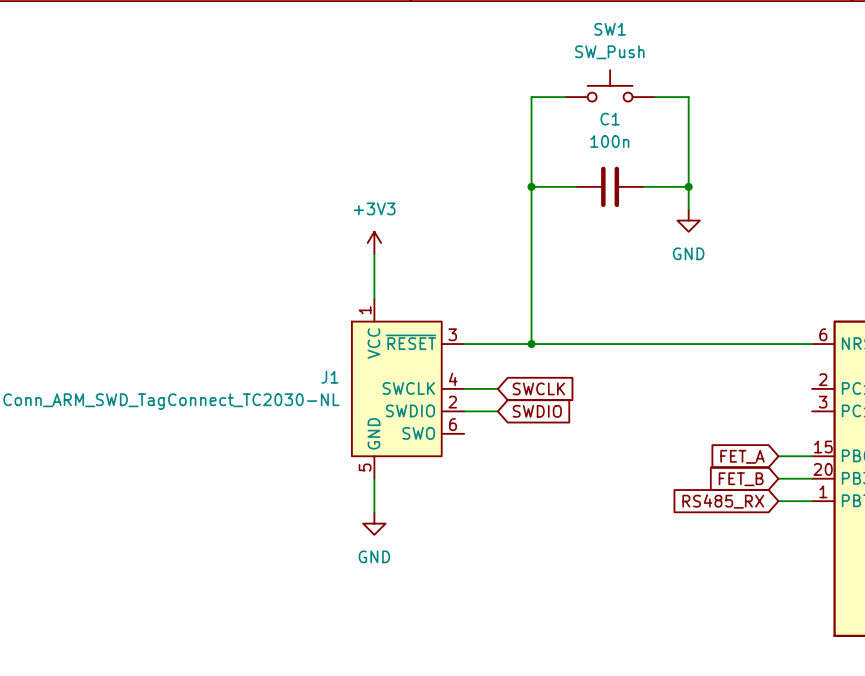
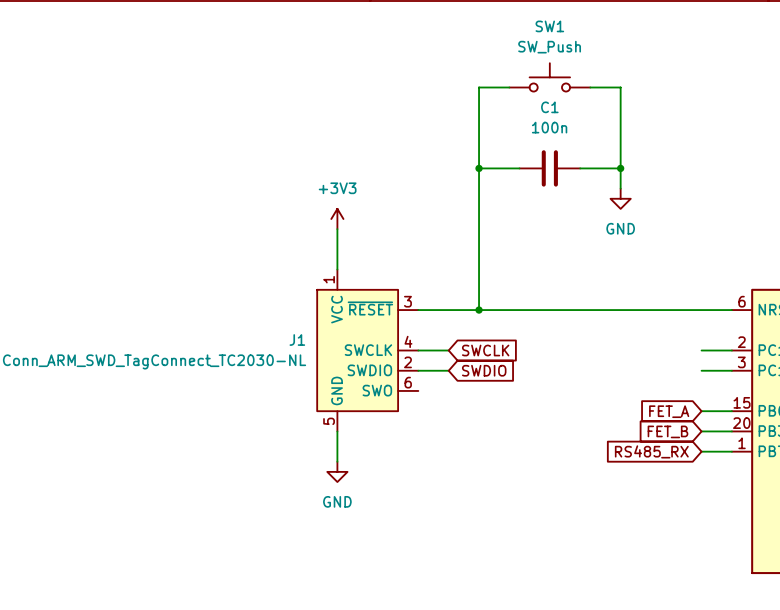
wire: none -> (701, 350) (731, 350)
wire: none -> (701, 370) (731, 370)

